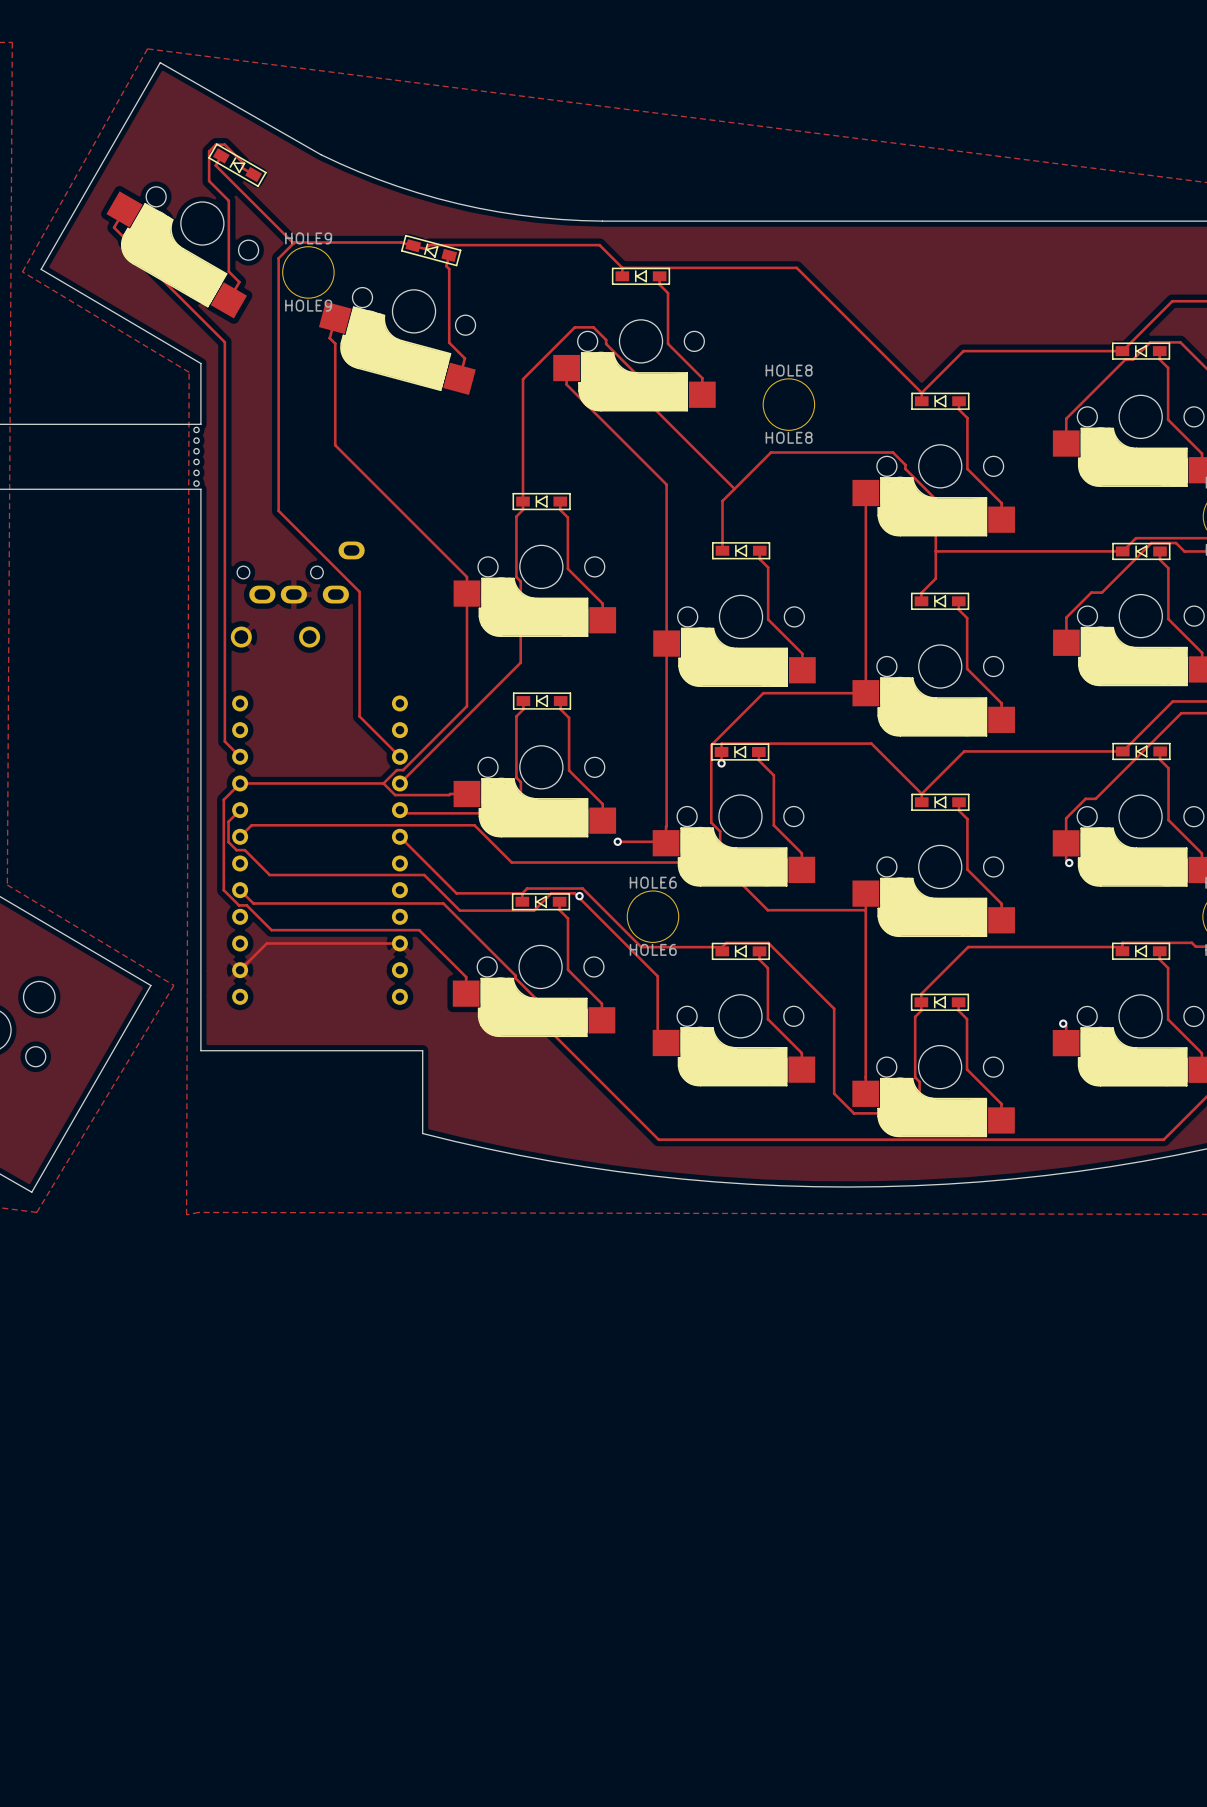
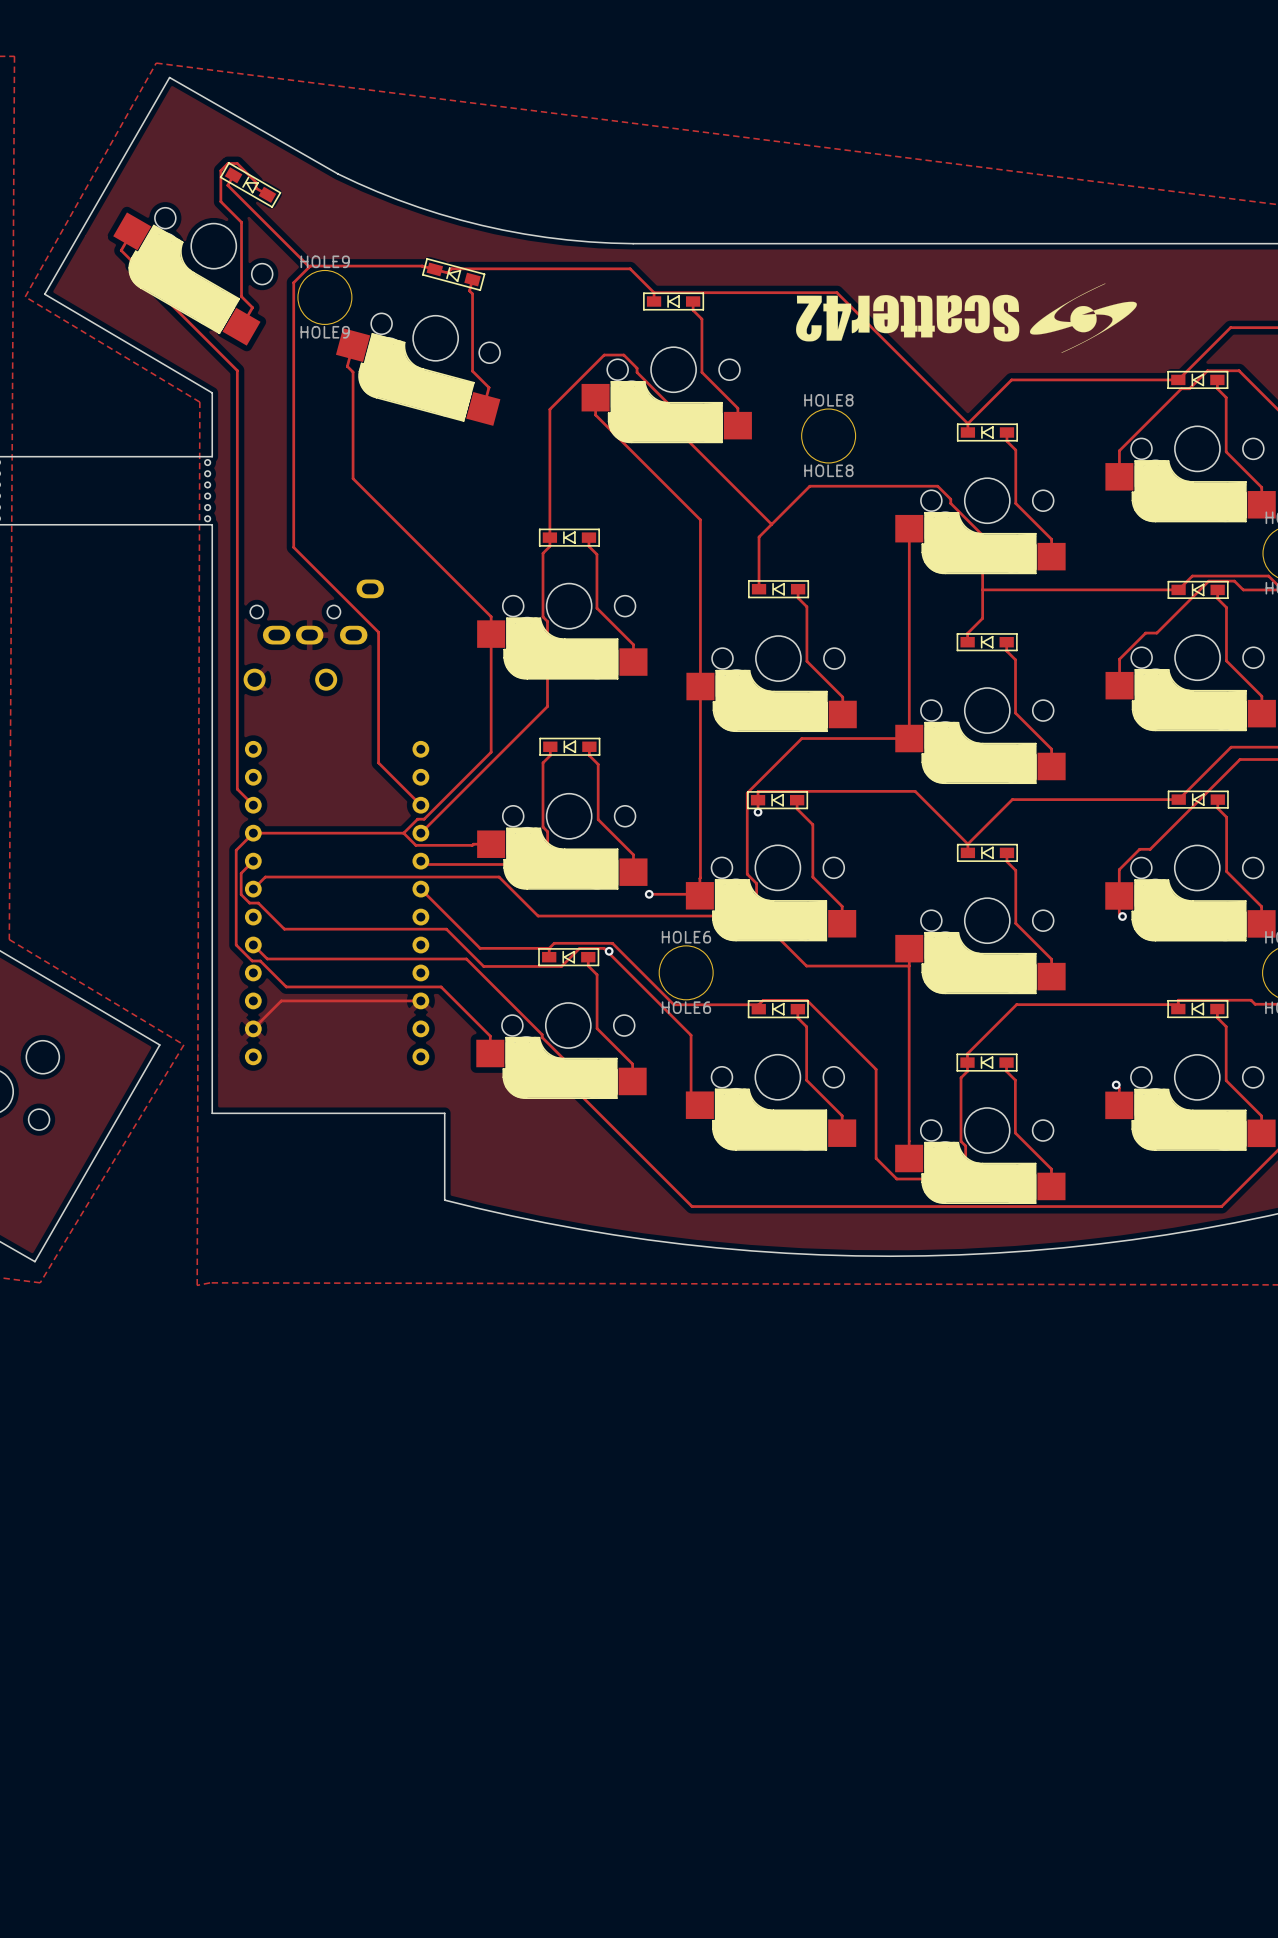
drawing: none -> [796, 283, 1137, 353]

